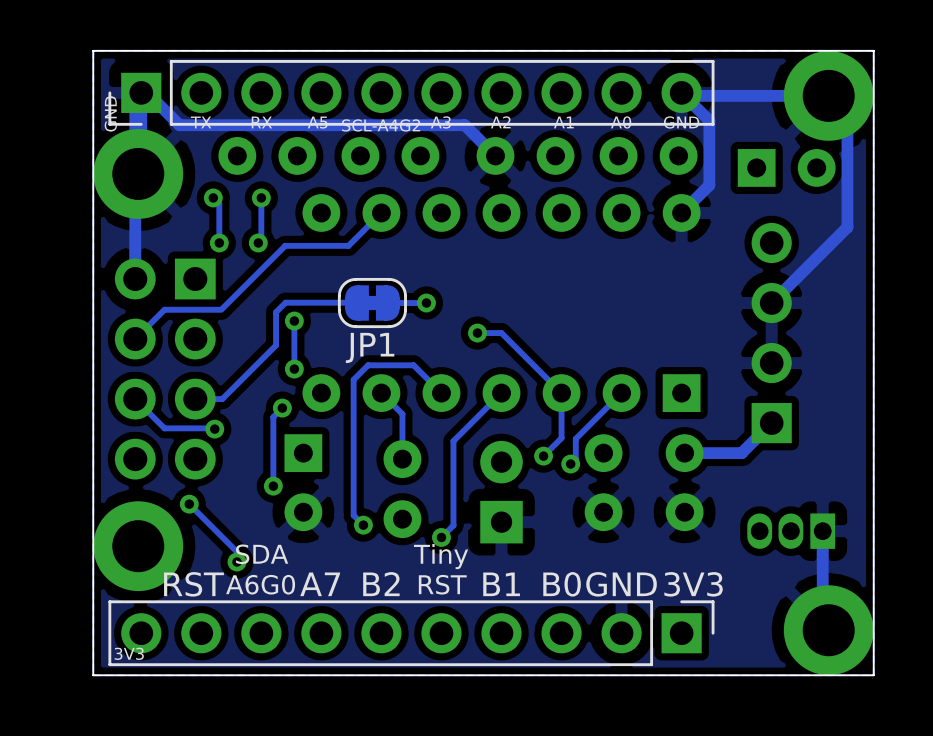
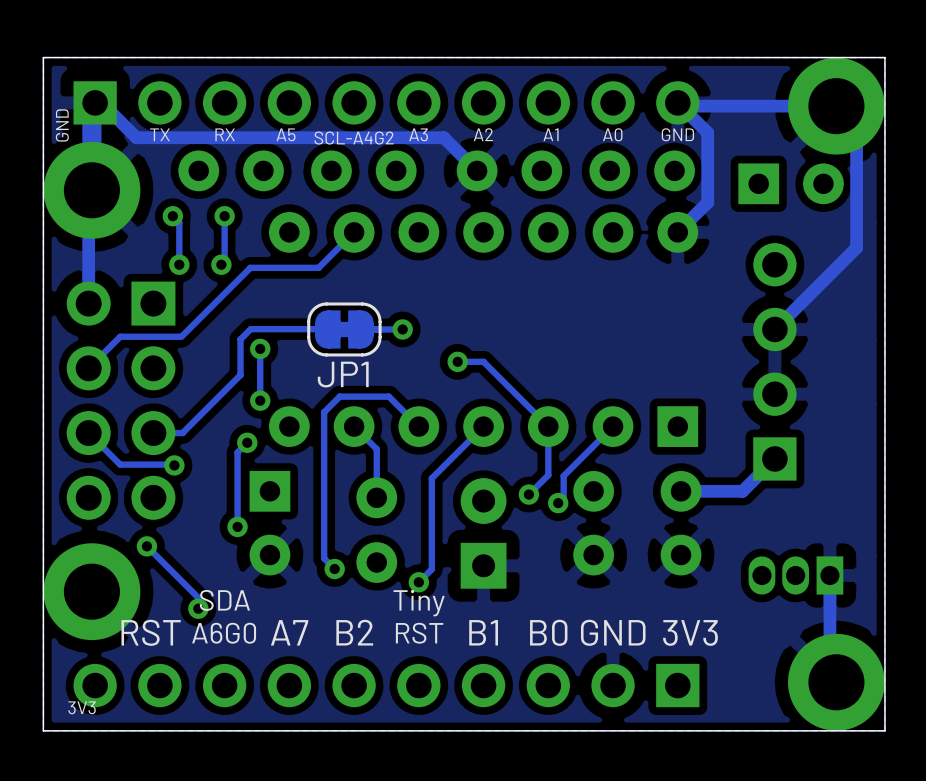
part side: bottom (411, 92) -> top (386, 102)
part side: bottom (411, 633) -> top (386, 685)

